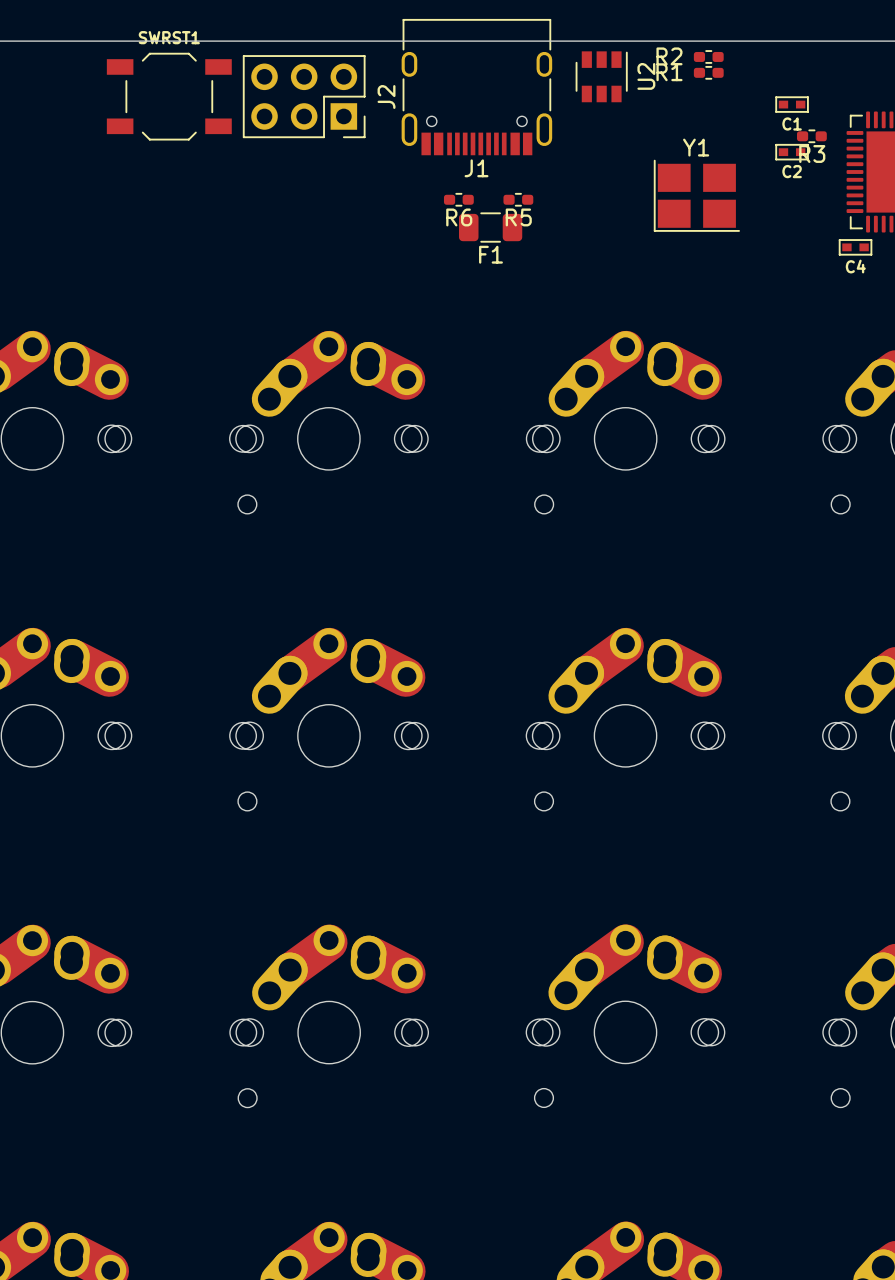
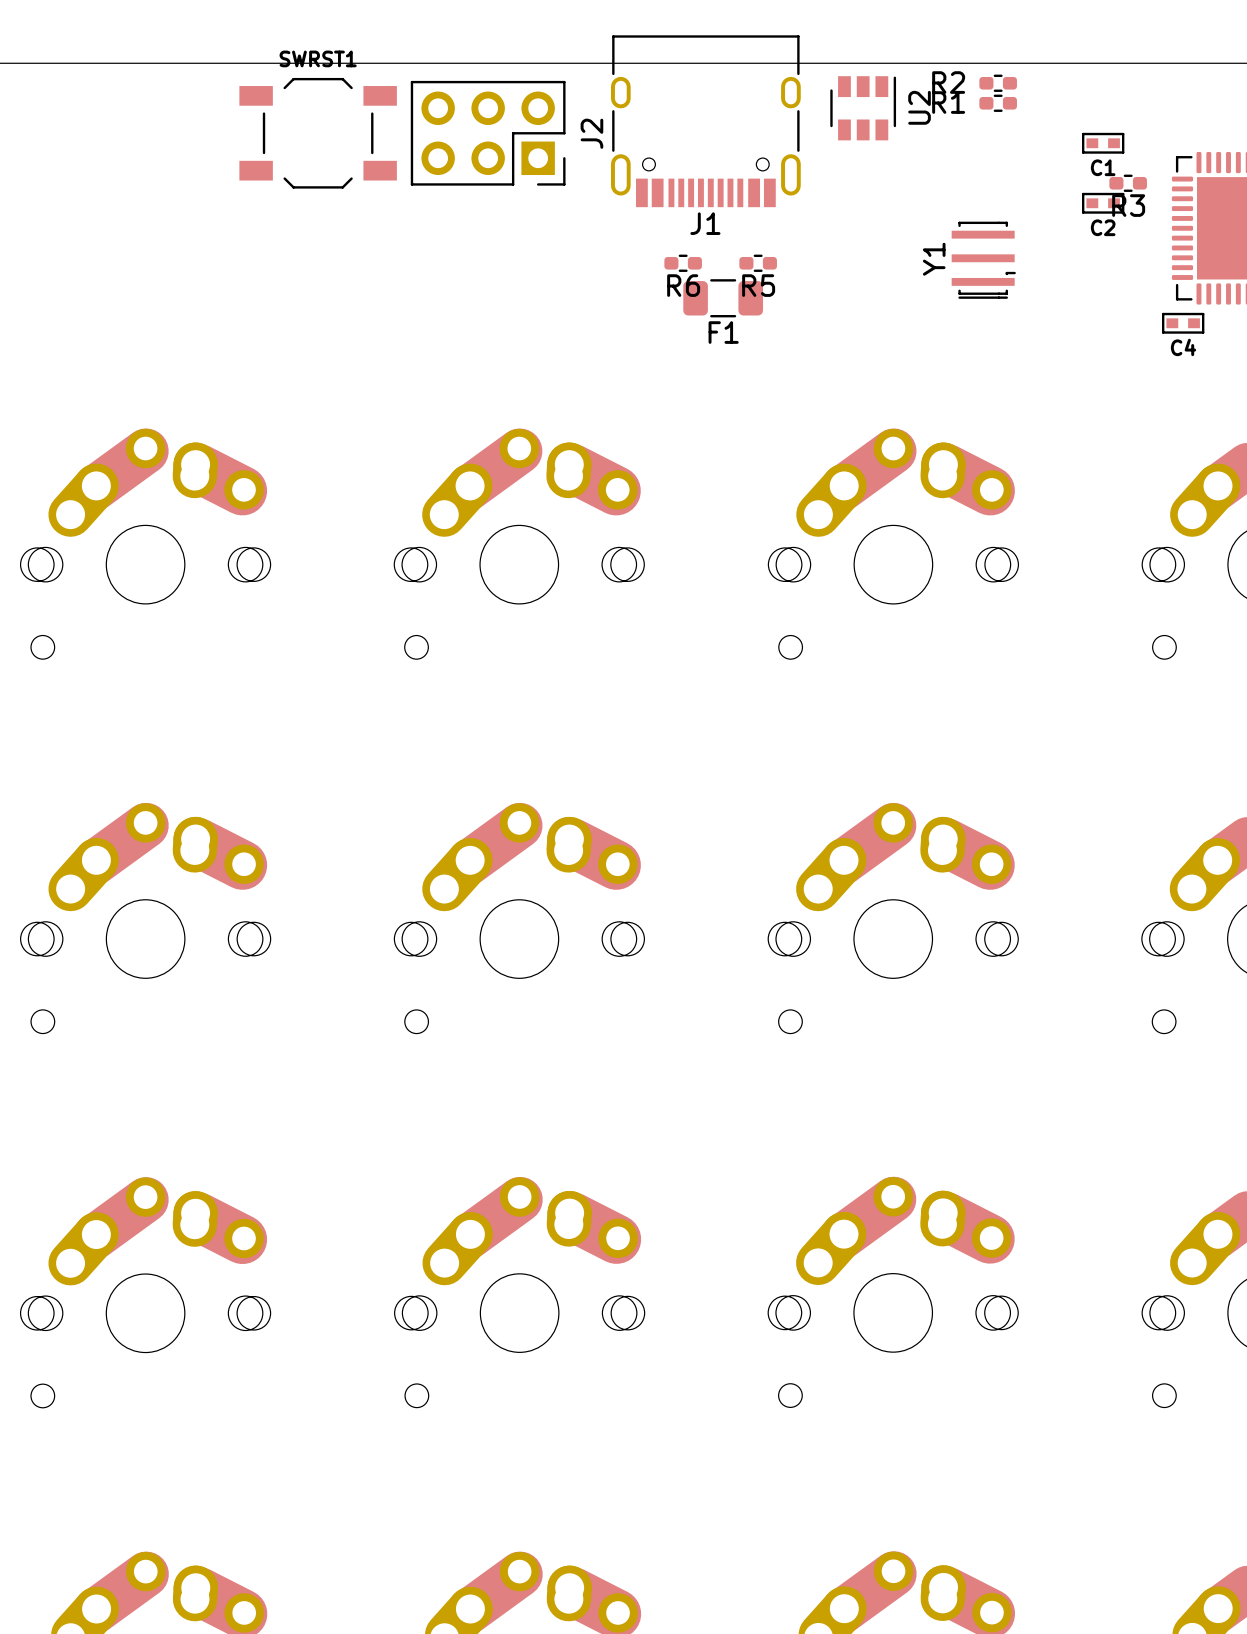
Y1 name position: Y1 (696, 147) -> Y1 (934, 259)
Y1 footprint: [653, 159, 740, 232] -> [951, 221, 1016, 299]

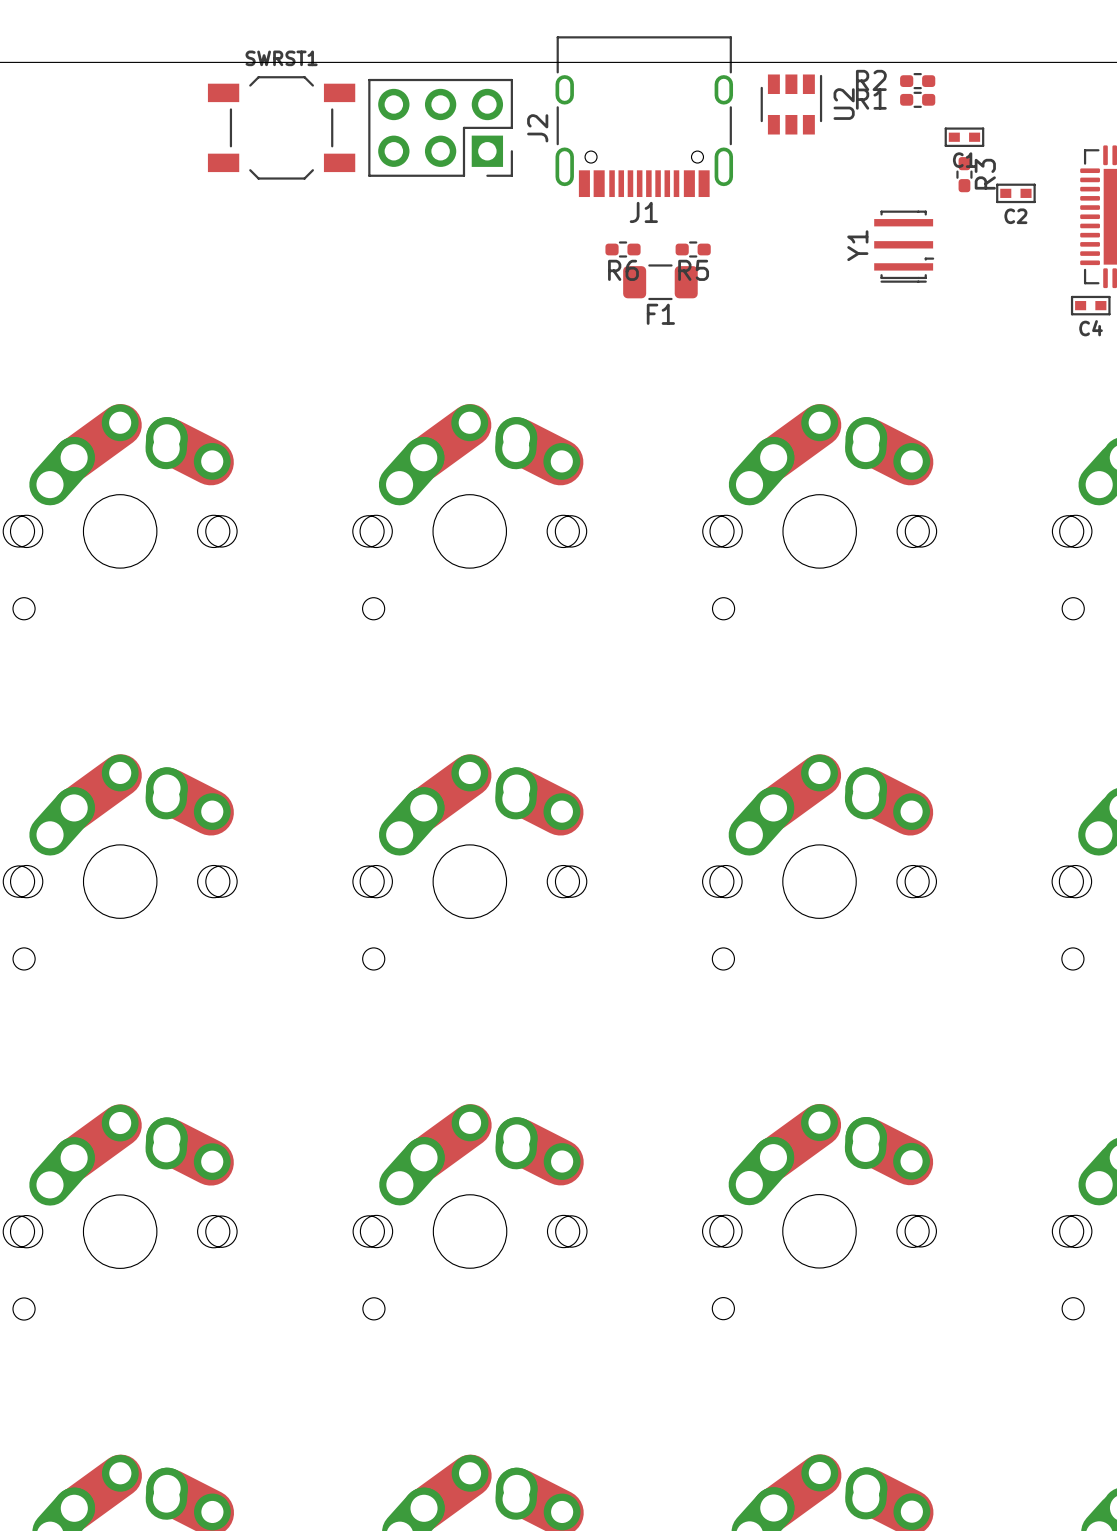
C1 position: (1103, 143) -> (964, 137)
R3 rotation: 0° (1128, 183) -> 90° clockwise (964, 174)
R3 position: (1128, 183) -> (964, 174)

